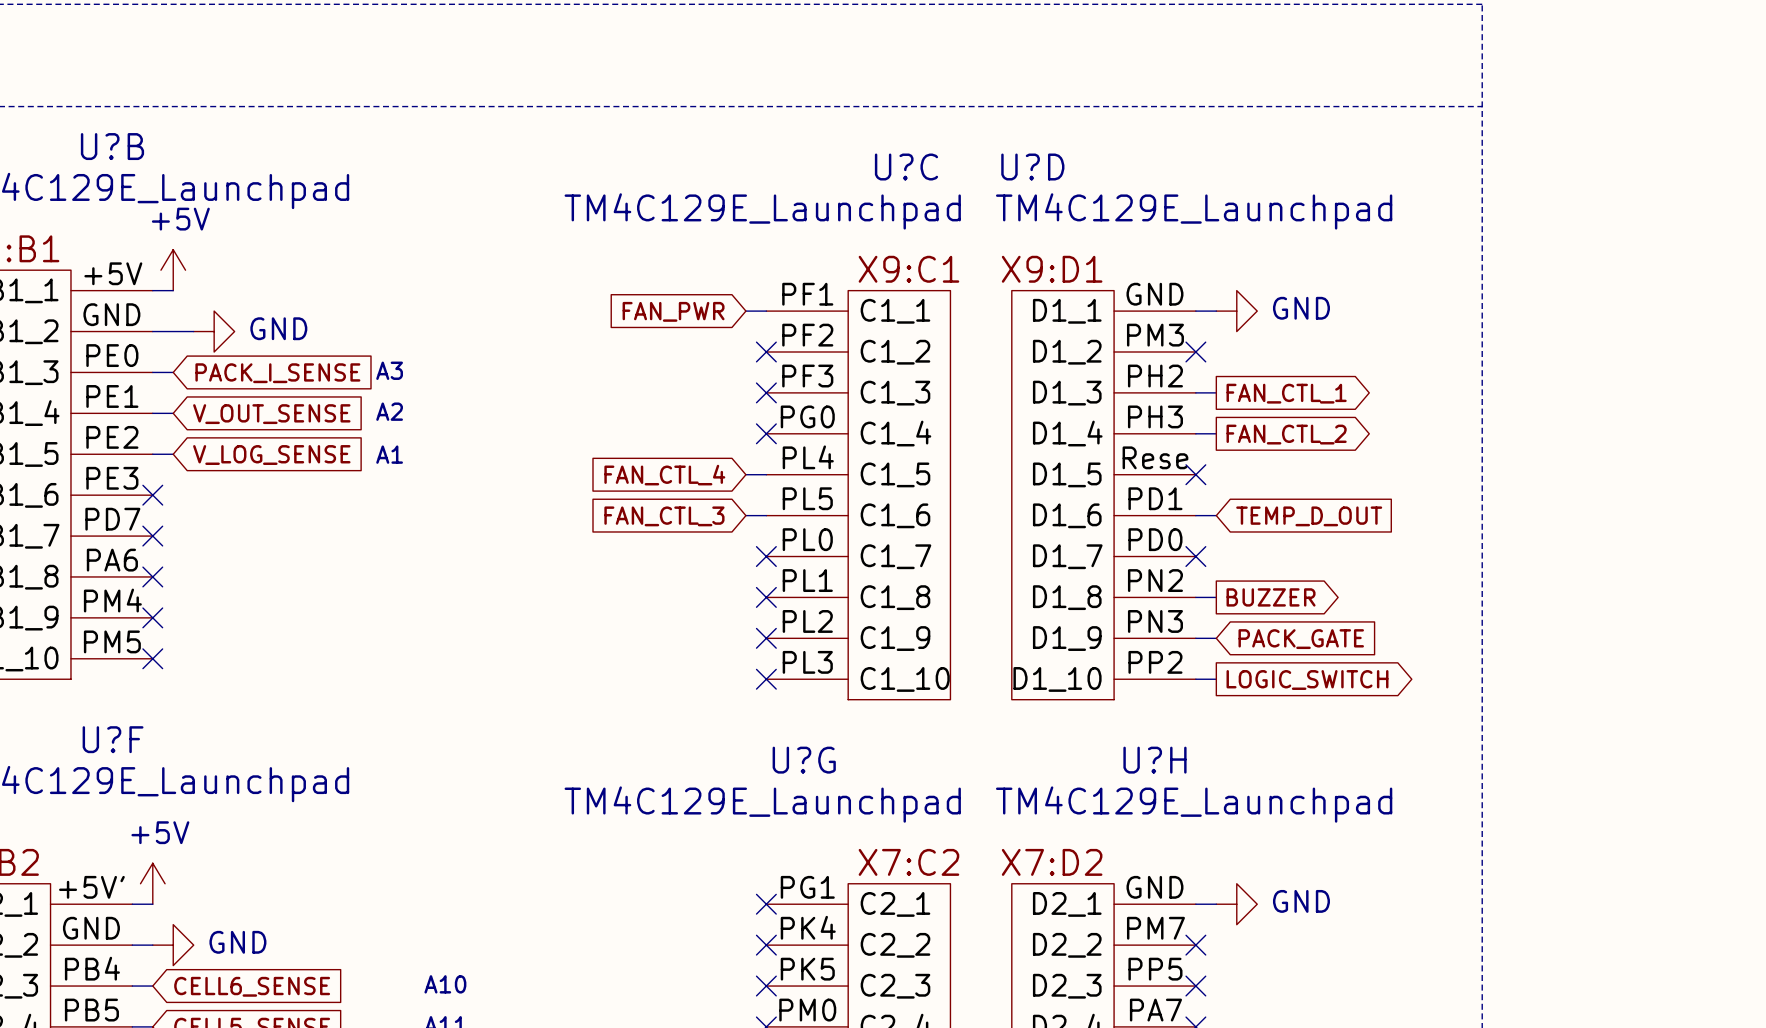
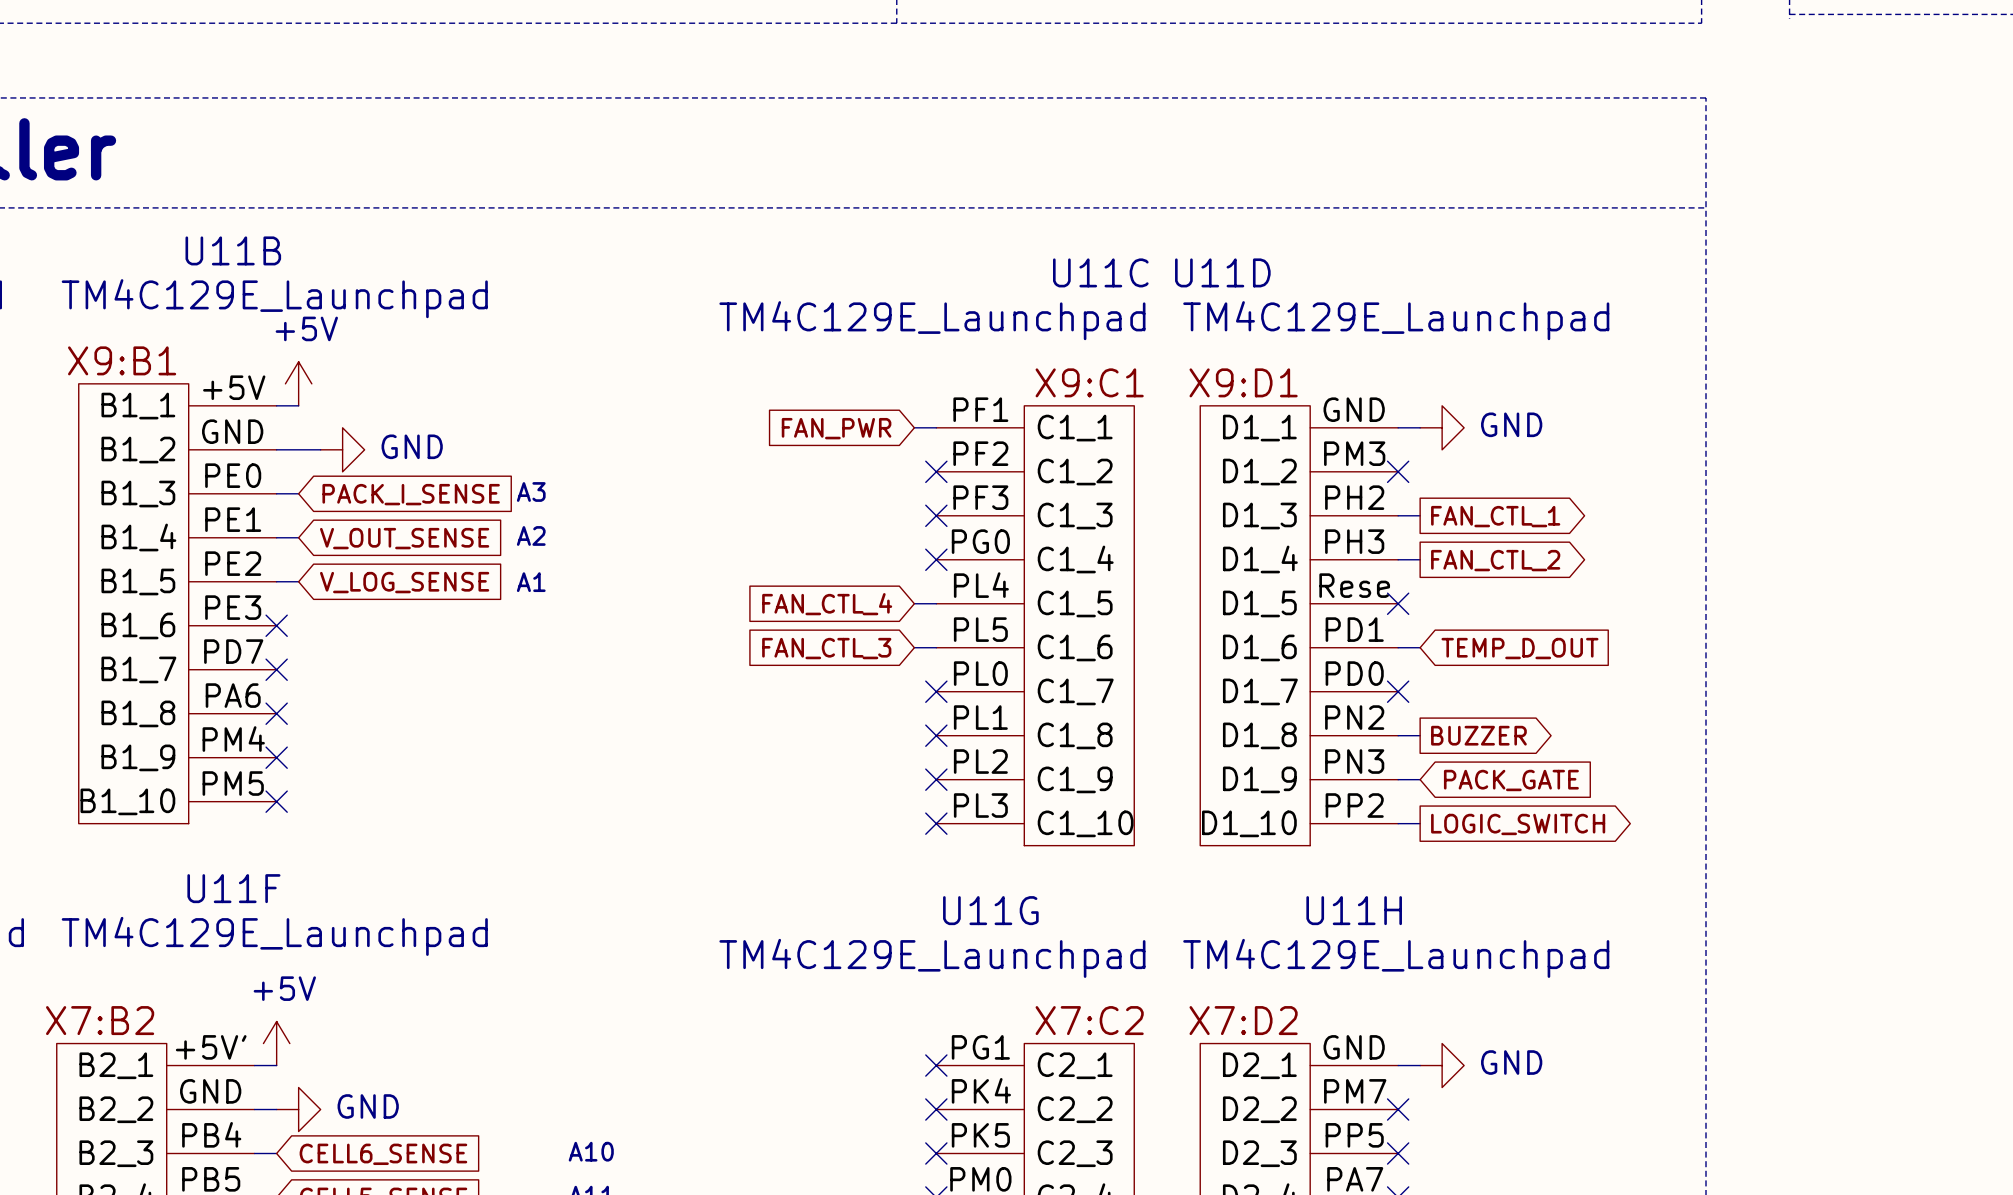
U?B name: U?B (112, 146) -> U11B (233, 250)
U?C name: U?C (906, 167) -> U11C (1100, 272)
U?D name: U?D (1032, 167) -> U11D (1222, 272)
U?F name: U?F (113, 739) -> U11F (233, 888)
U?G name: U?G (804, 760) -> U11G (990, 910)
U?H name: U?H (1154, 760) -> U11H (1354, 910)

